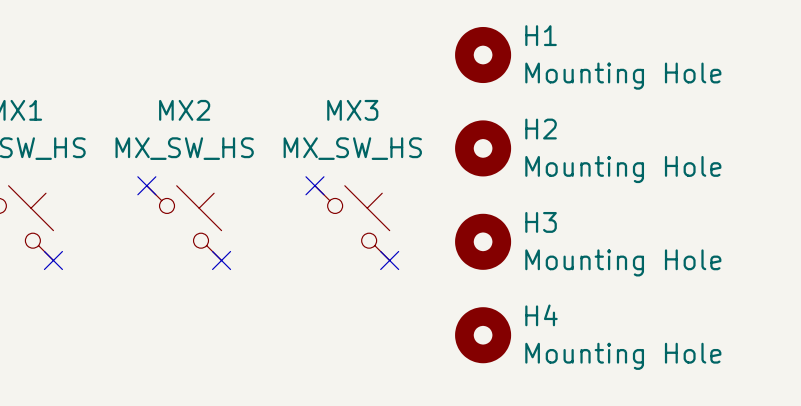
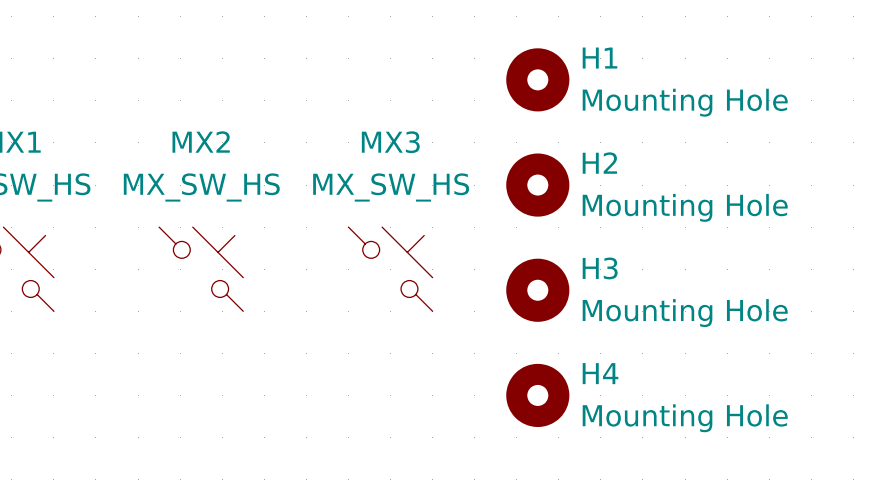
no-connect mark: (146, 185) -> none
no-connect mark: (314, 185) -> none
no-connect mark: (53, 260) -> none
no-connect mark: (221, 260) -> none
no-connect mark: (389, 260) -> none

